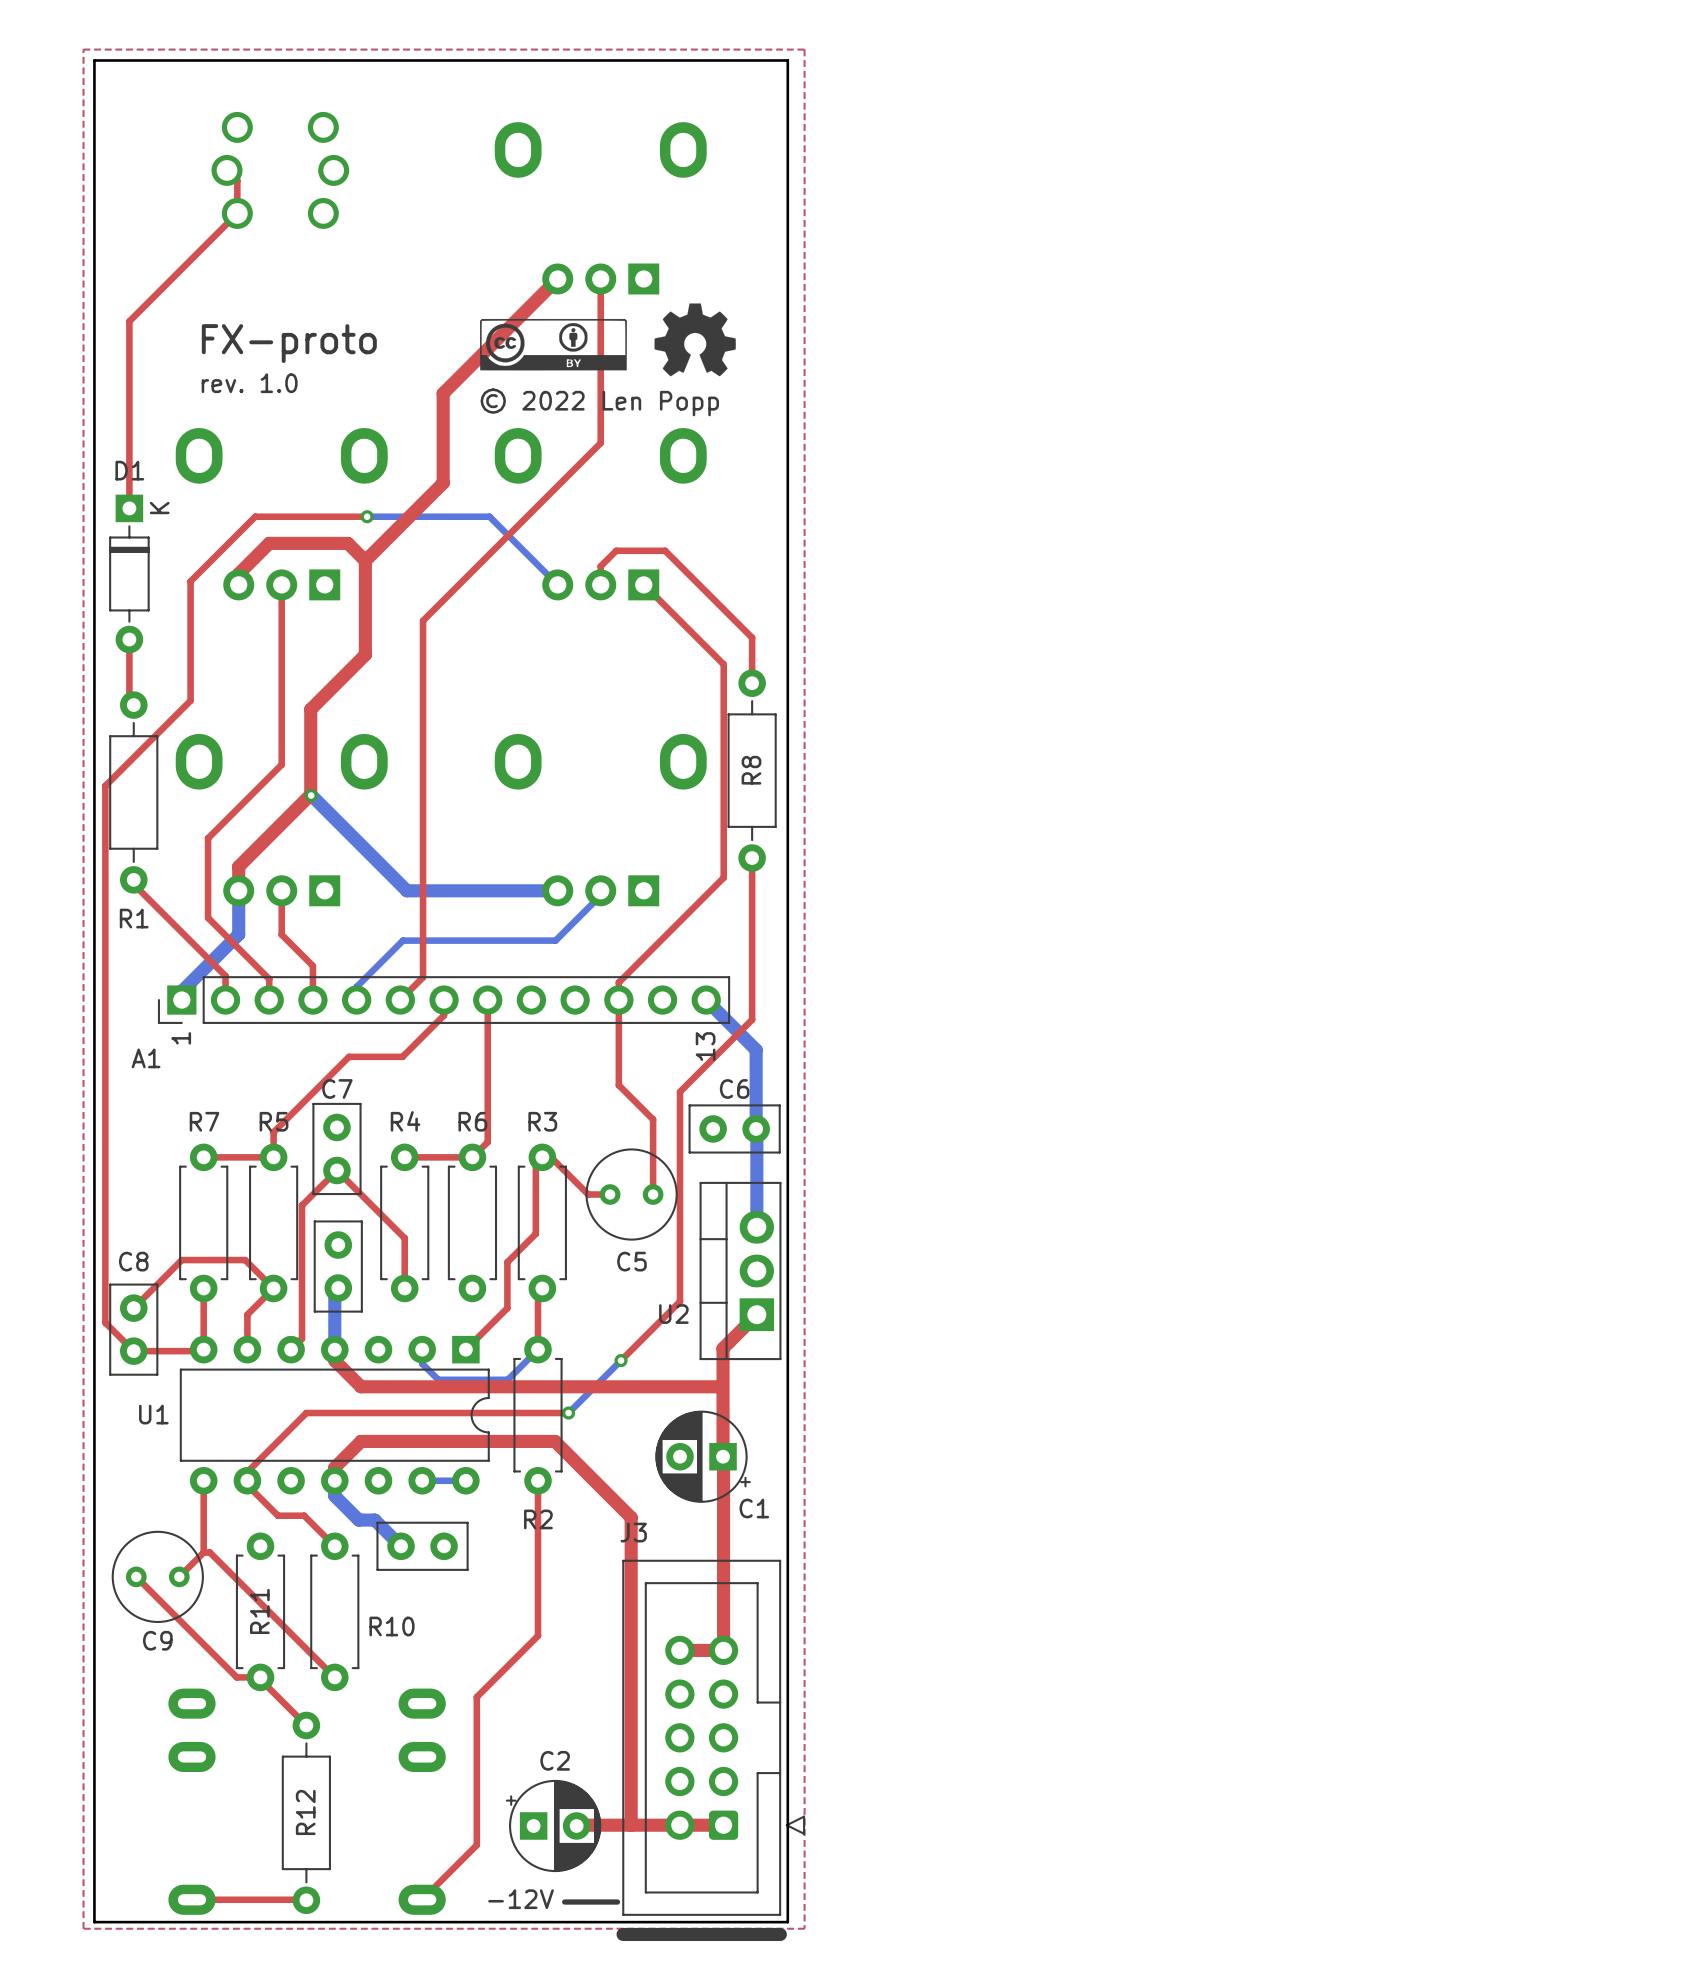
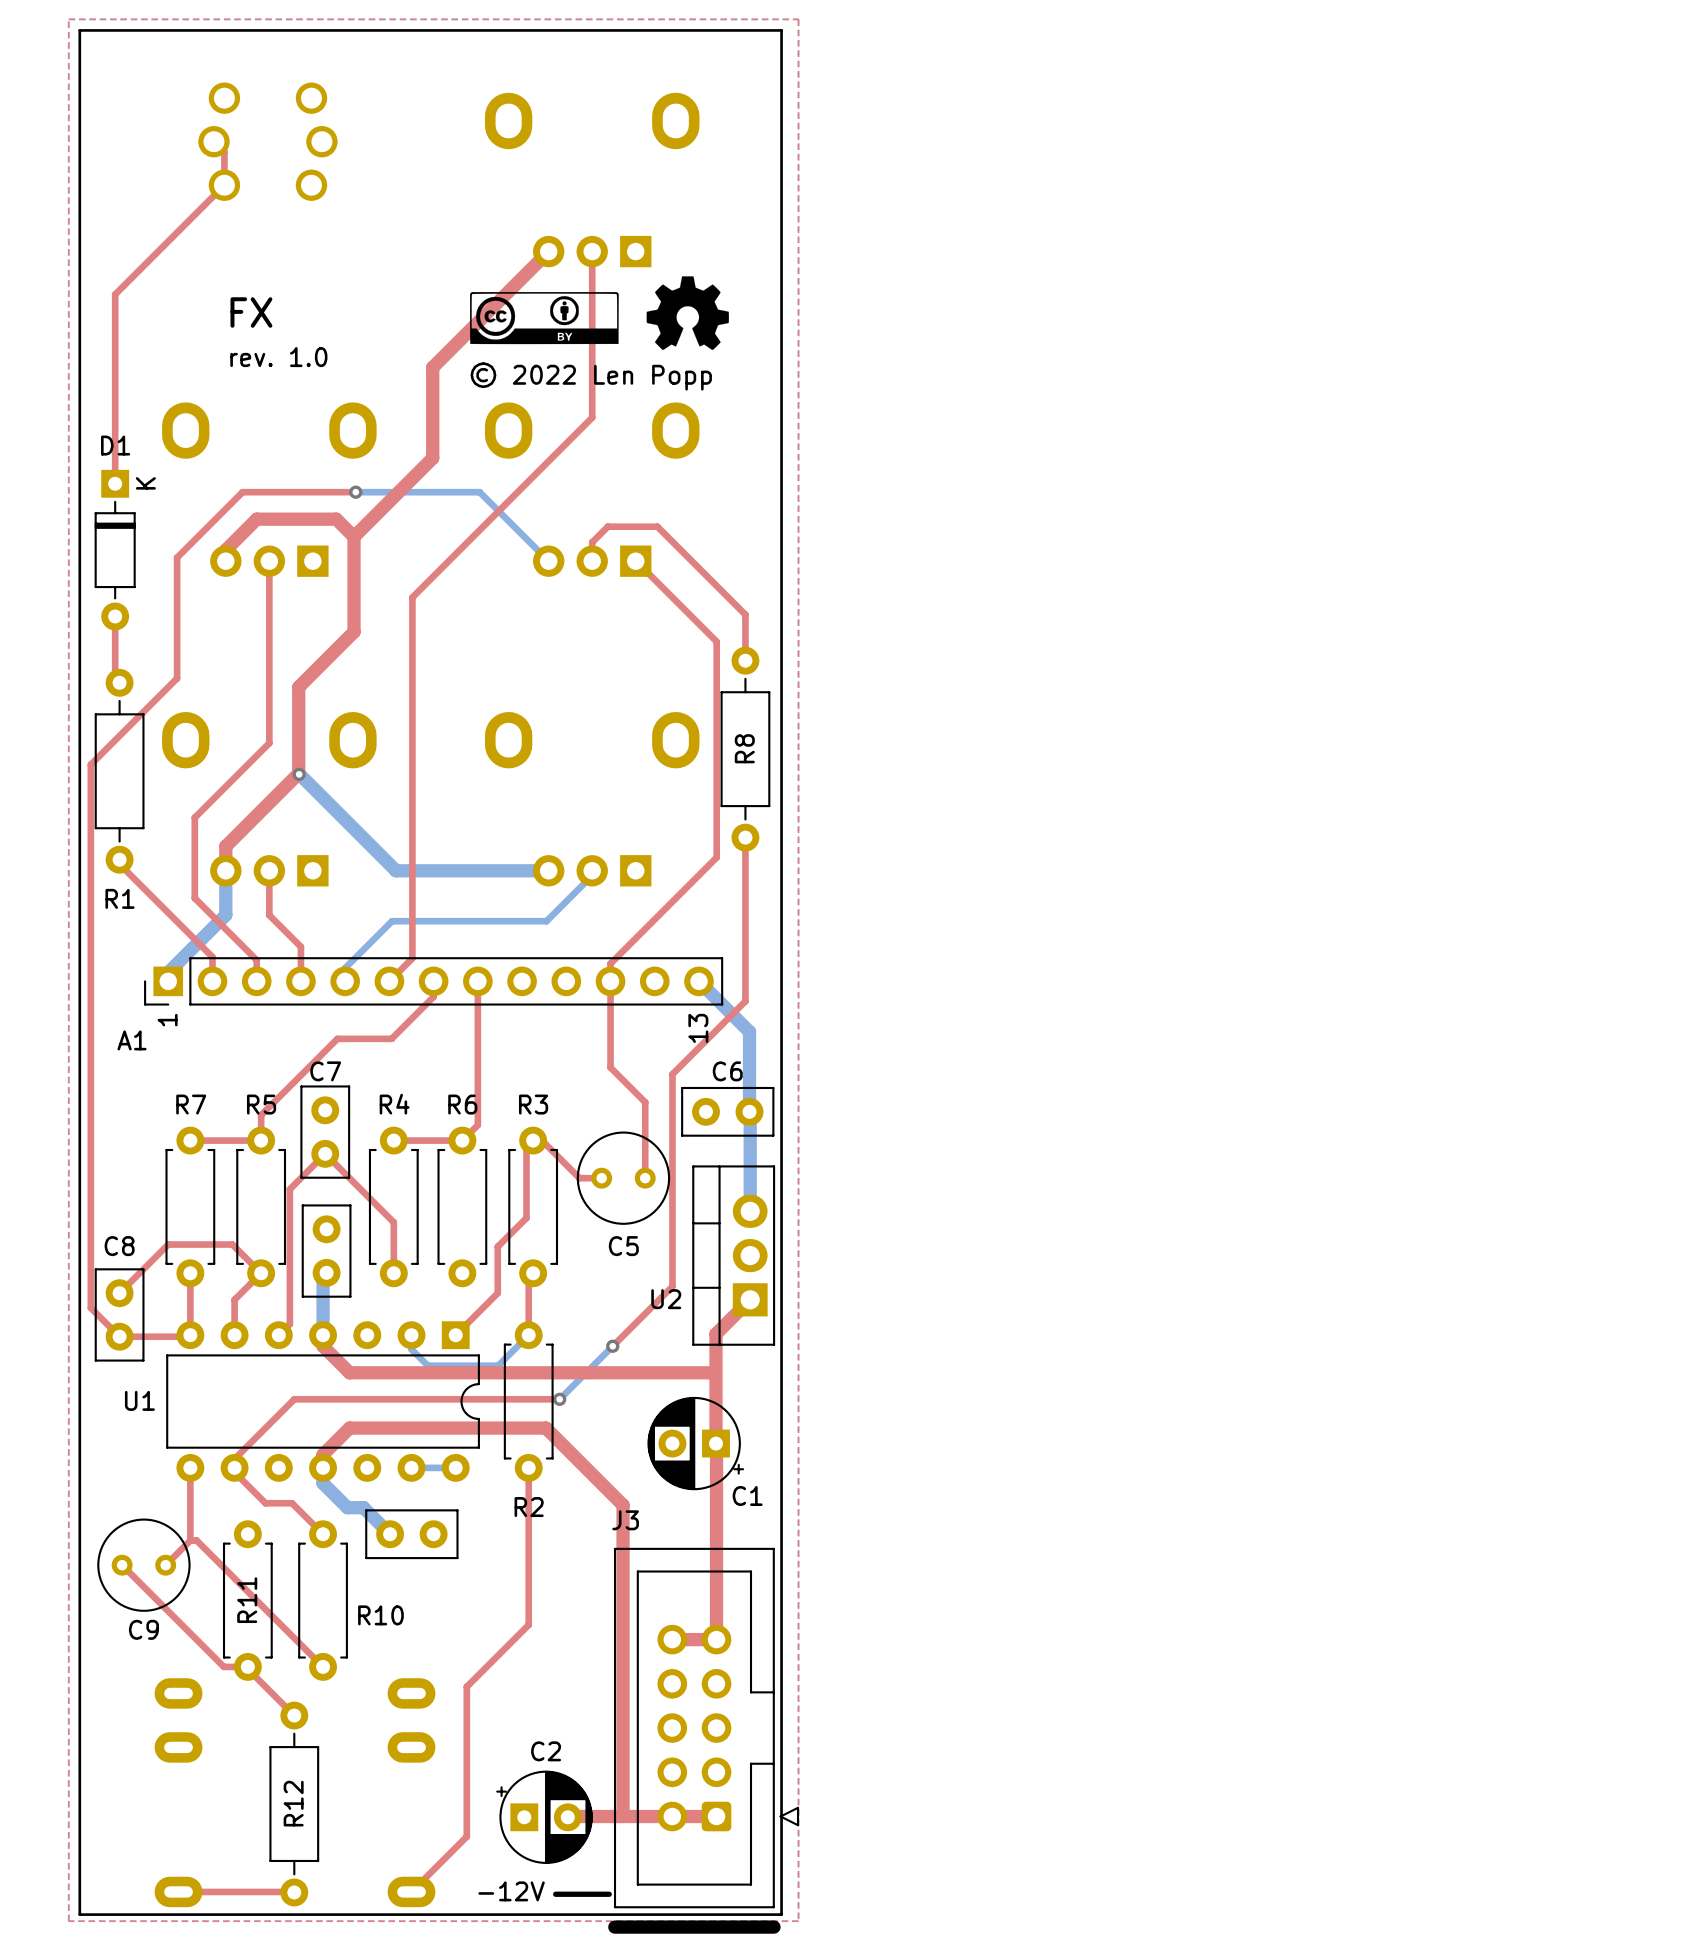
text: none -> FX (251, 312)
text: FX-proto (289, 343) -> none
text position: rev. 1.0 (249, 383) -> rev. 1.0 (278, 357)

